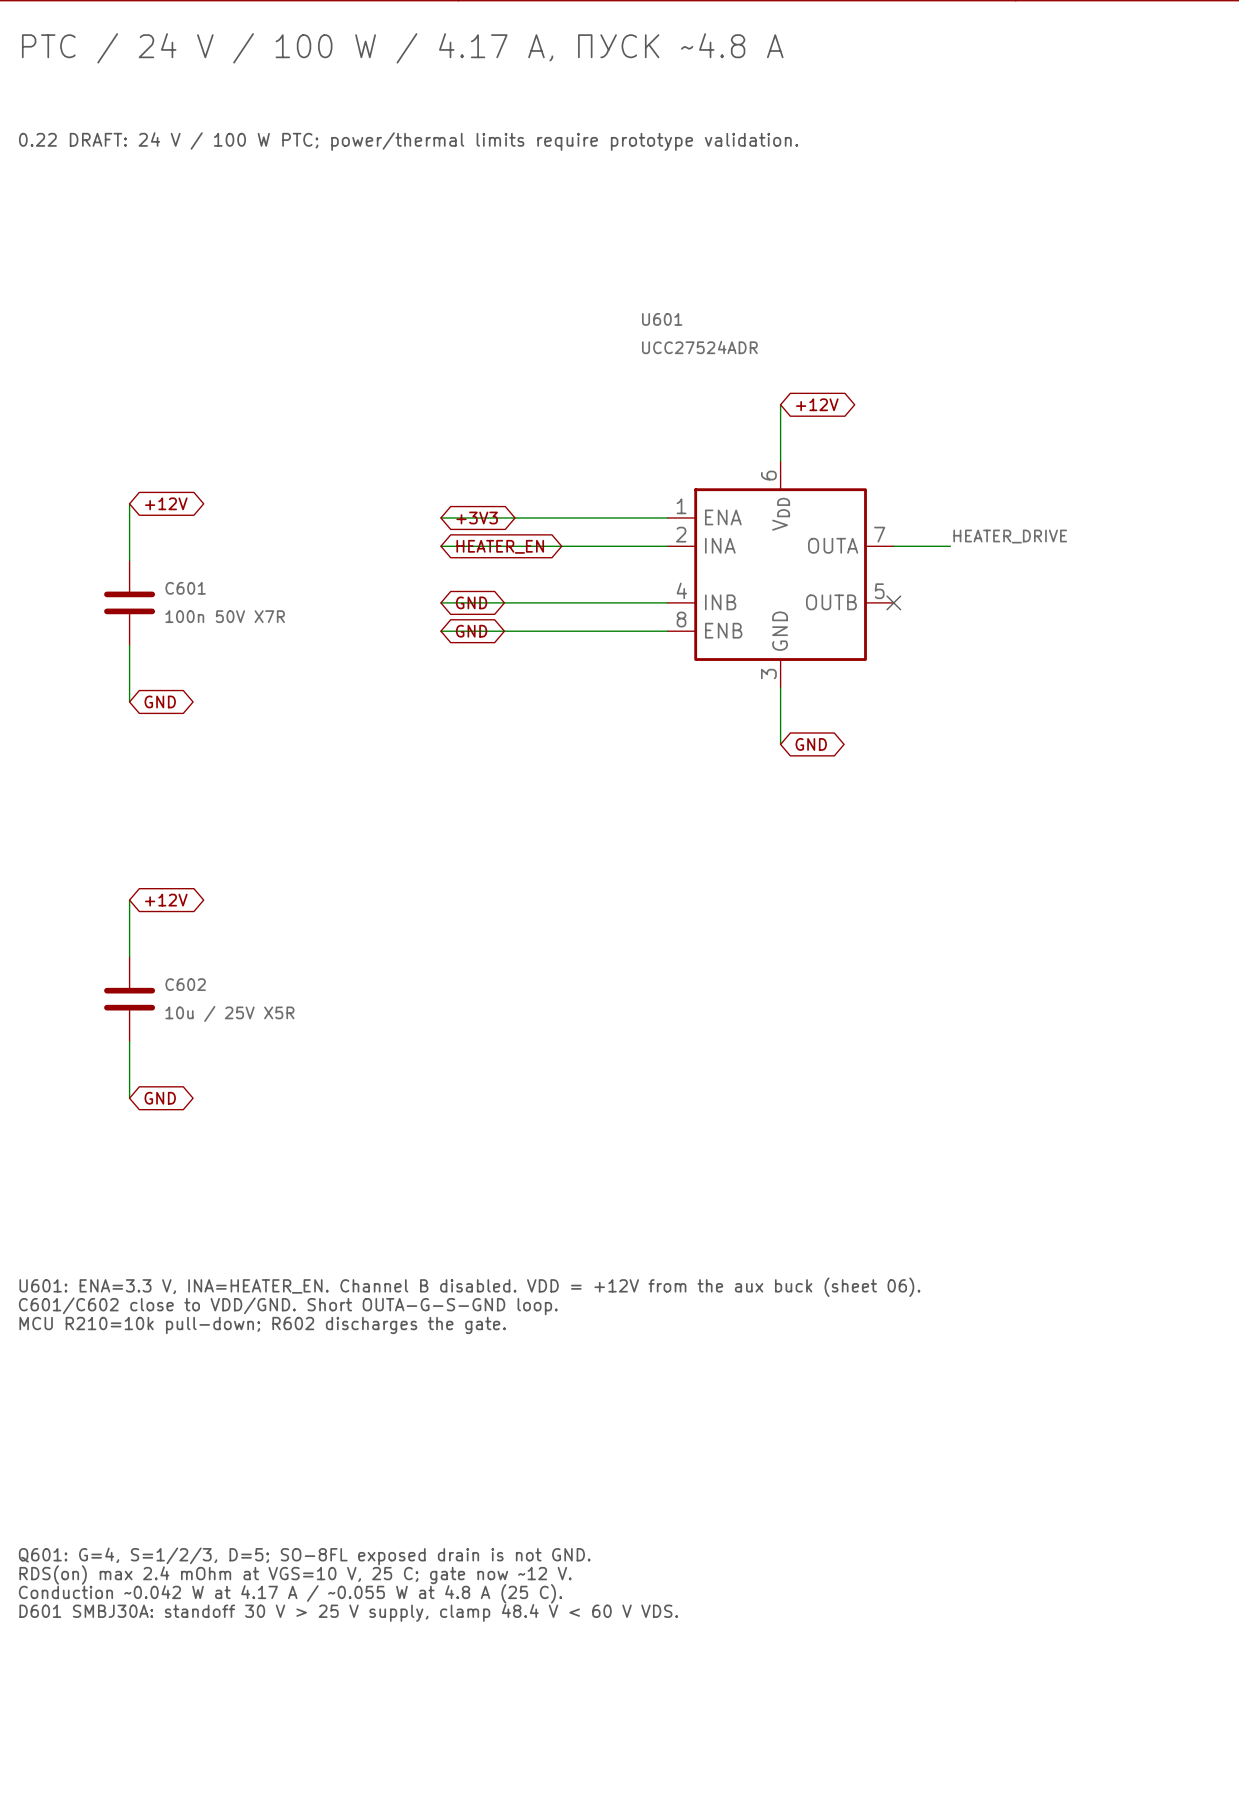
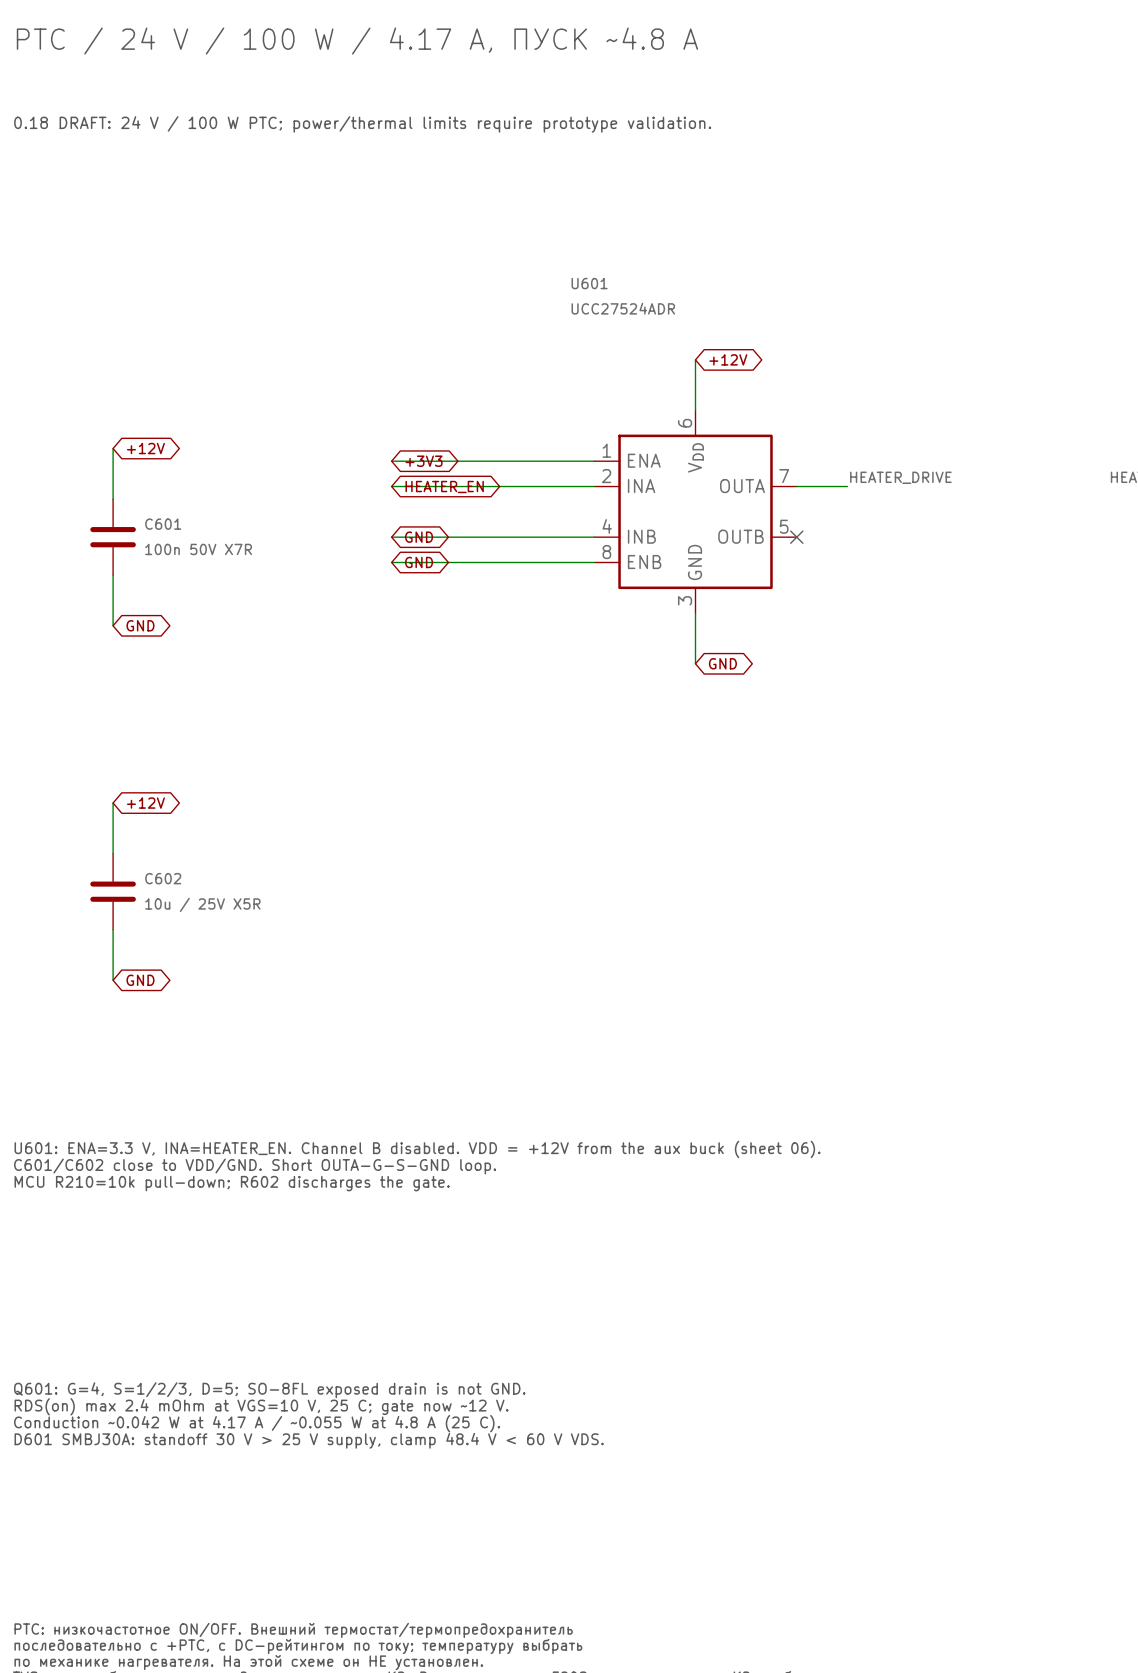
text: 0.22 DRAFT: 24 V / 100 W PTC; power/thermal limits require prototype validation. (408, 141) -> 0.18 DRAFT: 24 V / 100 W PTC; power/thermal limits require prototype validation. (362, 124)

